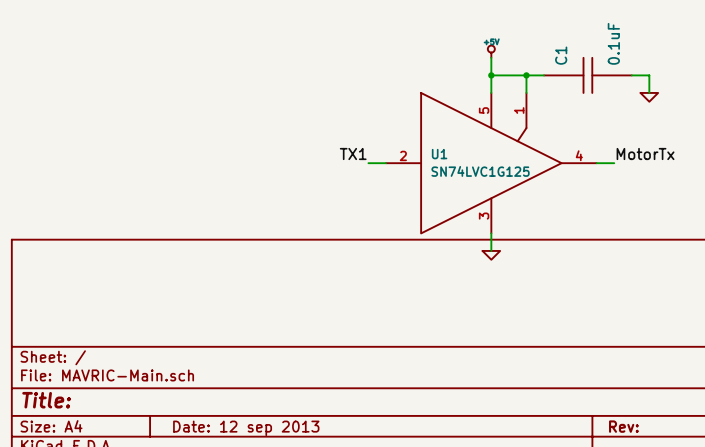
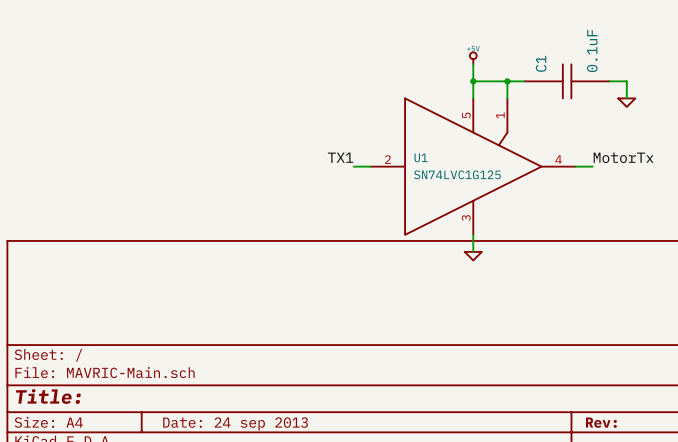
title block: Date: 12 sep 2013 (246, 428) -> Date: 24 sep 2013 (235, 423)

